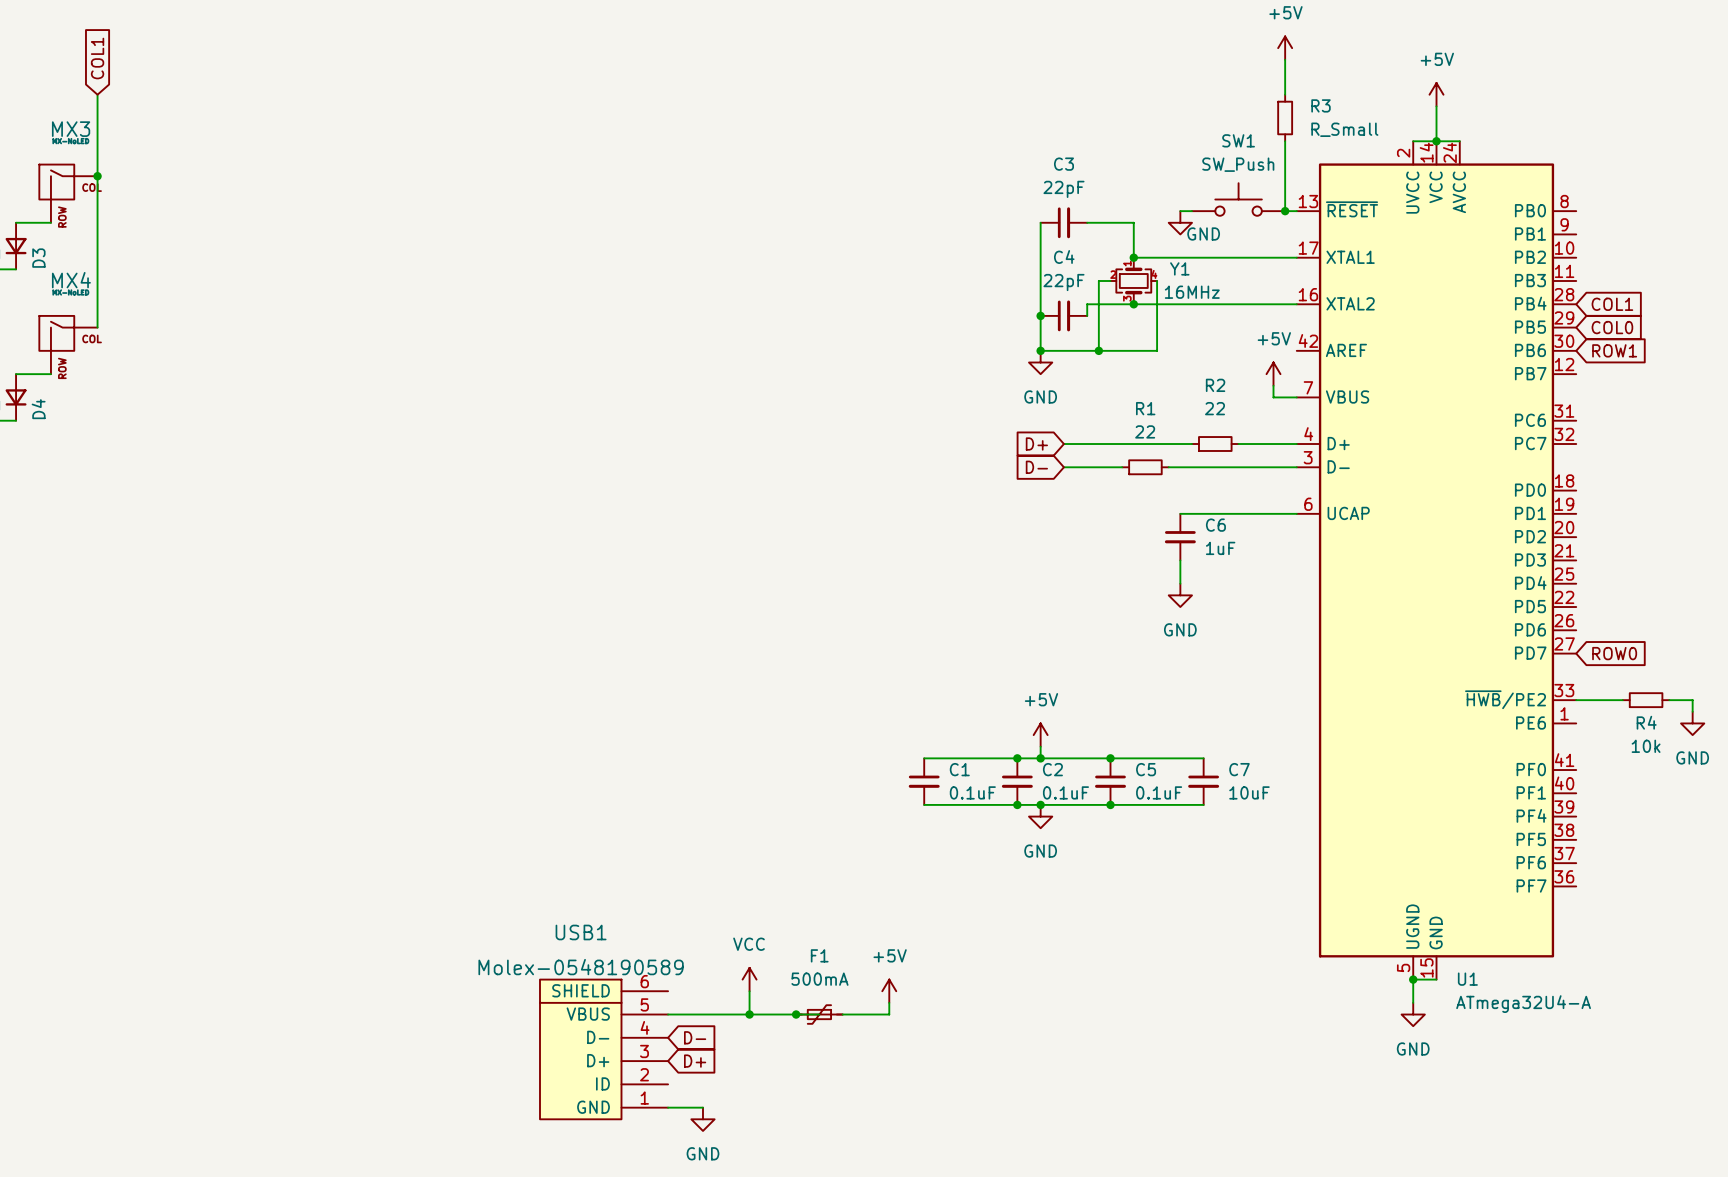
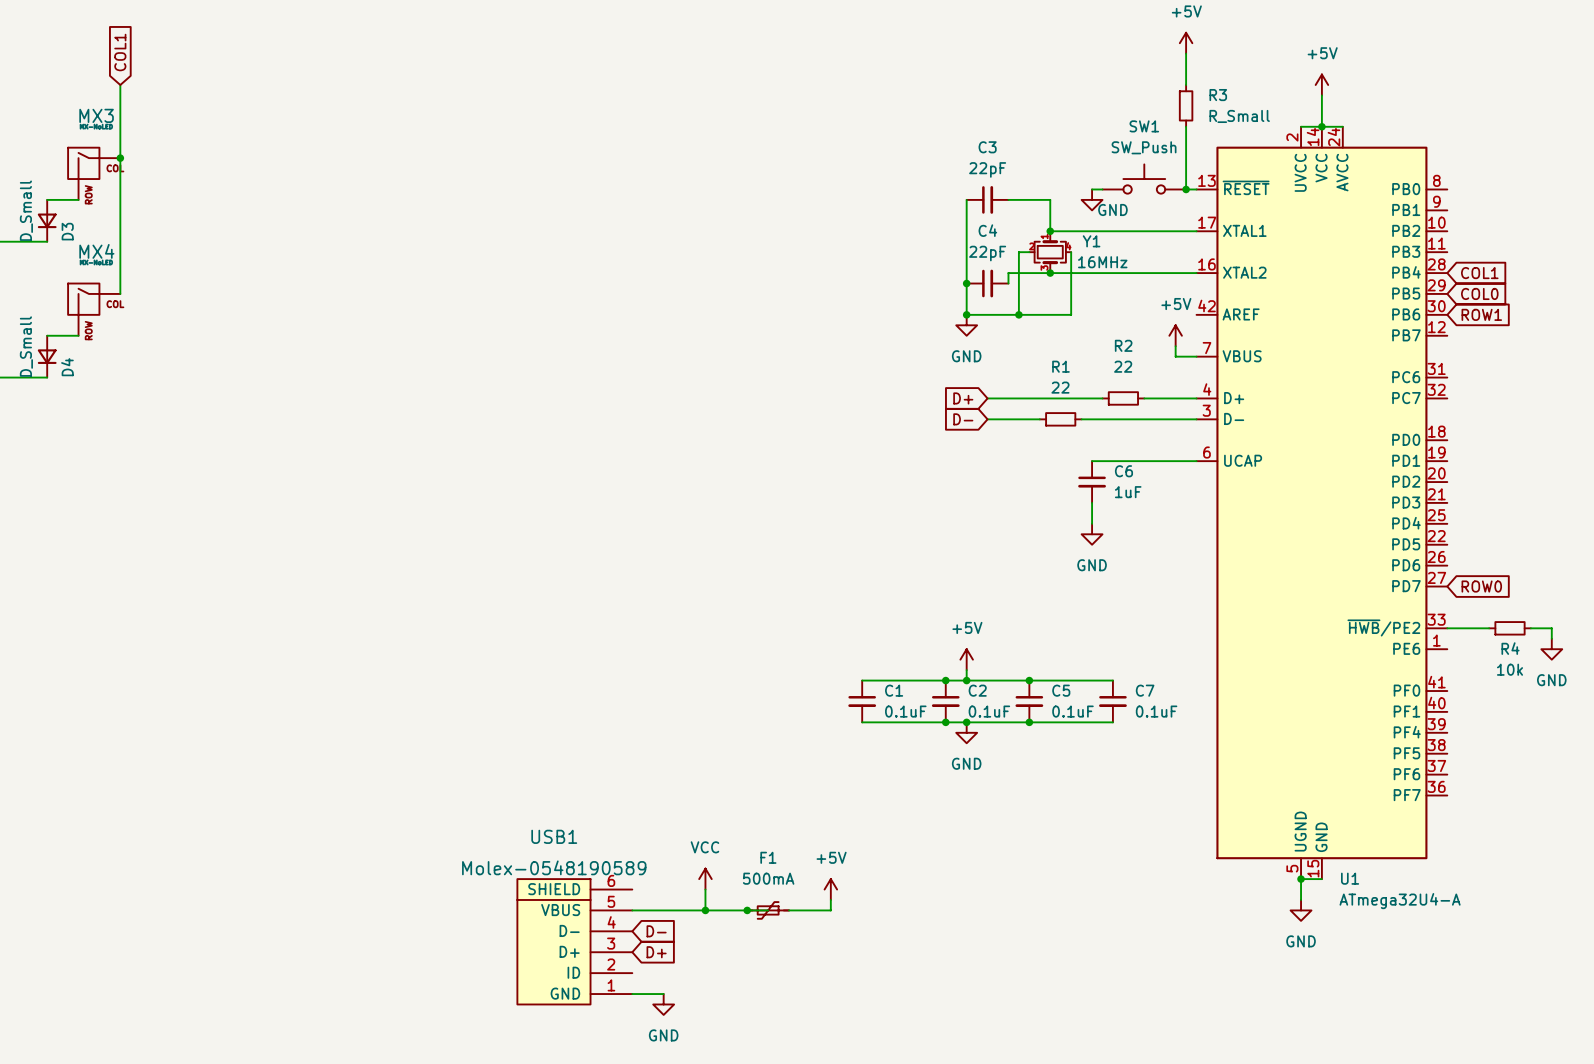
C7 value: 10uF (1249, 792) -> 0.1uF (1156, 711)

